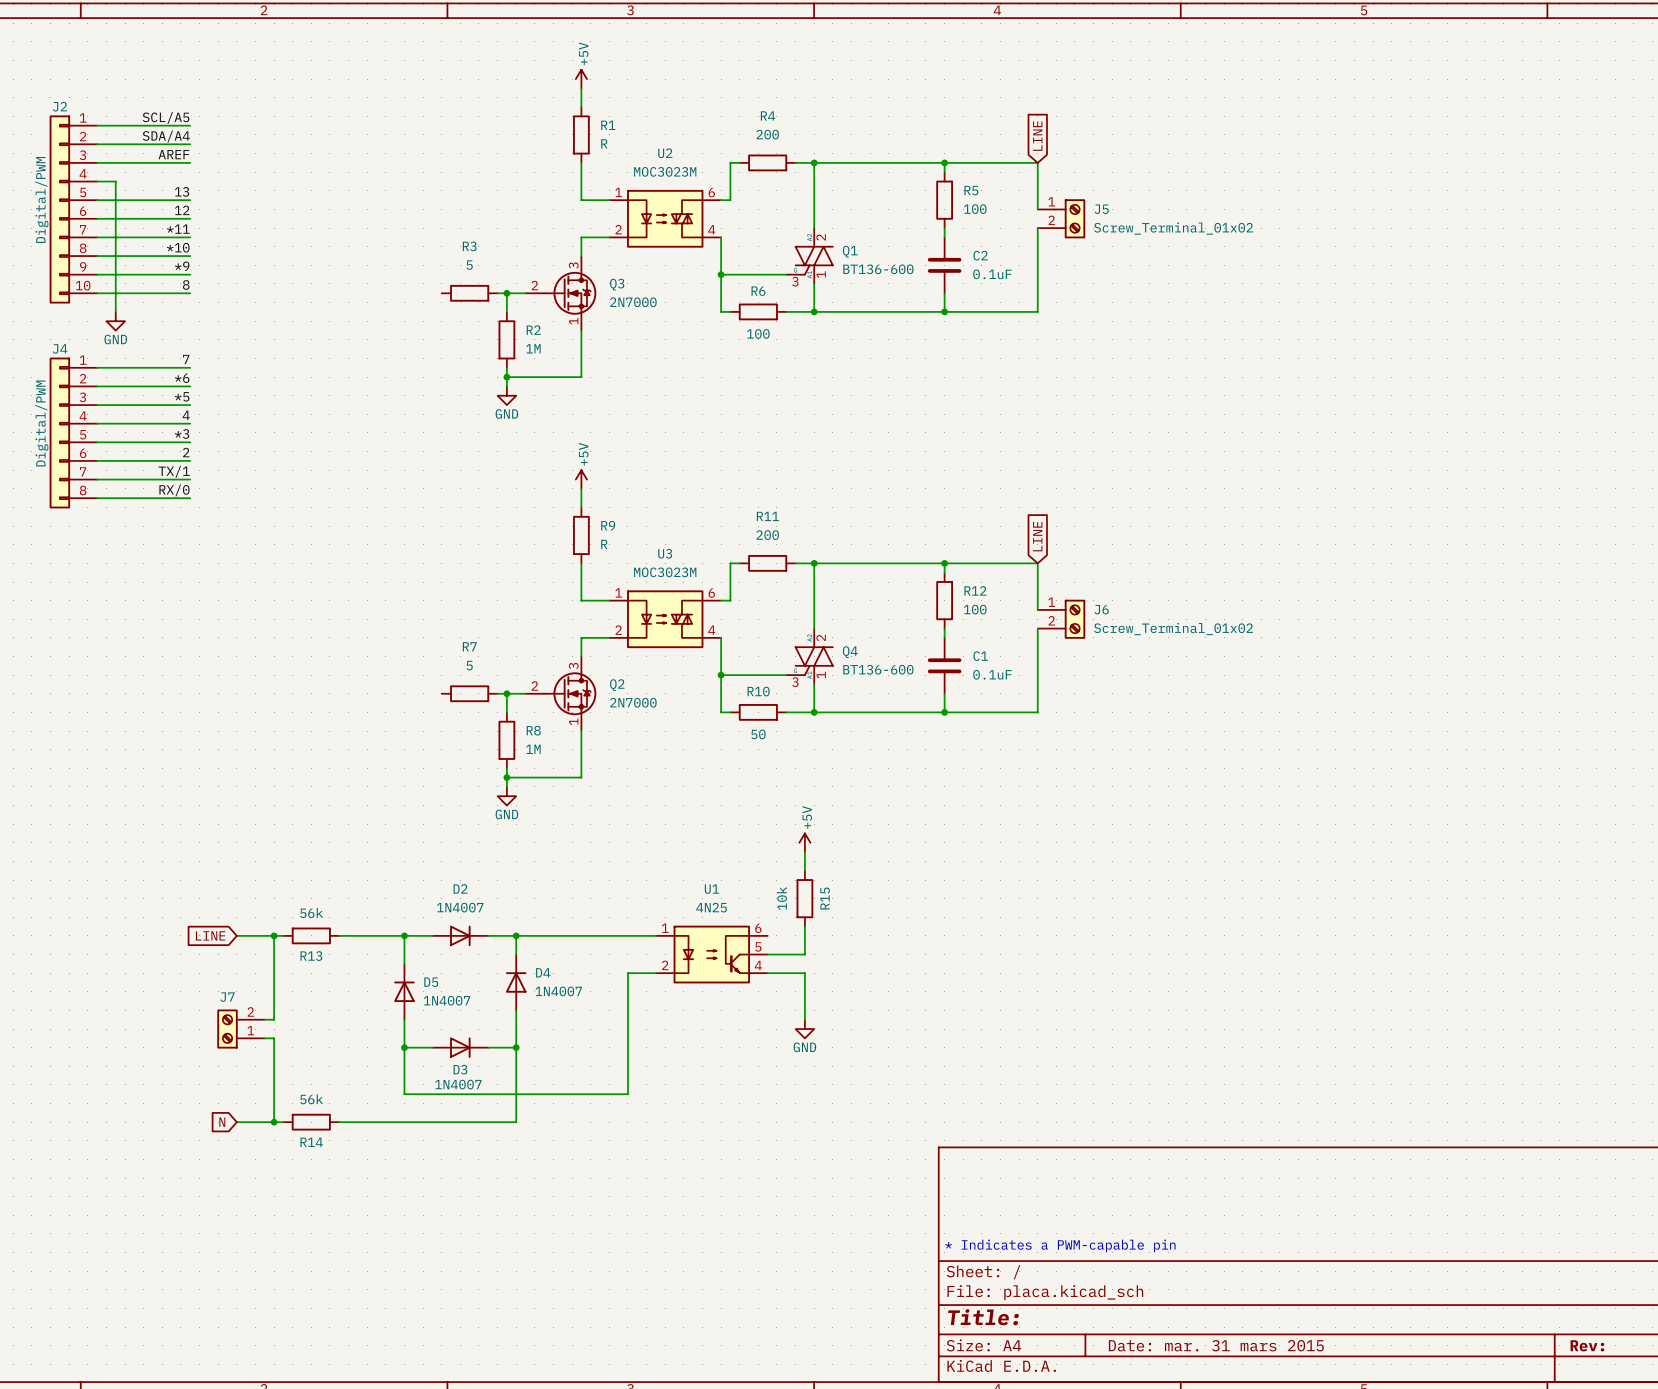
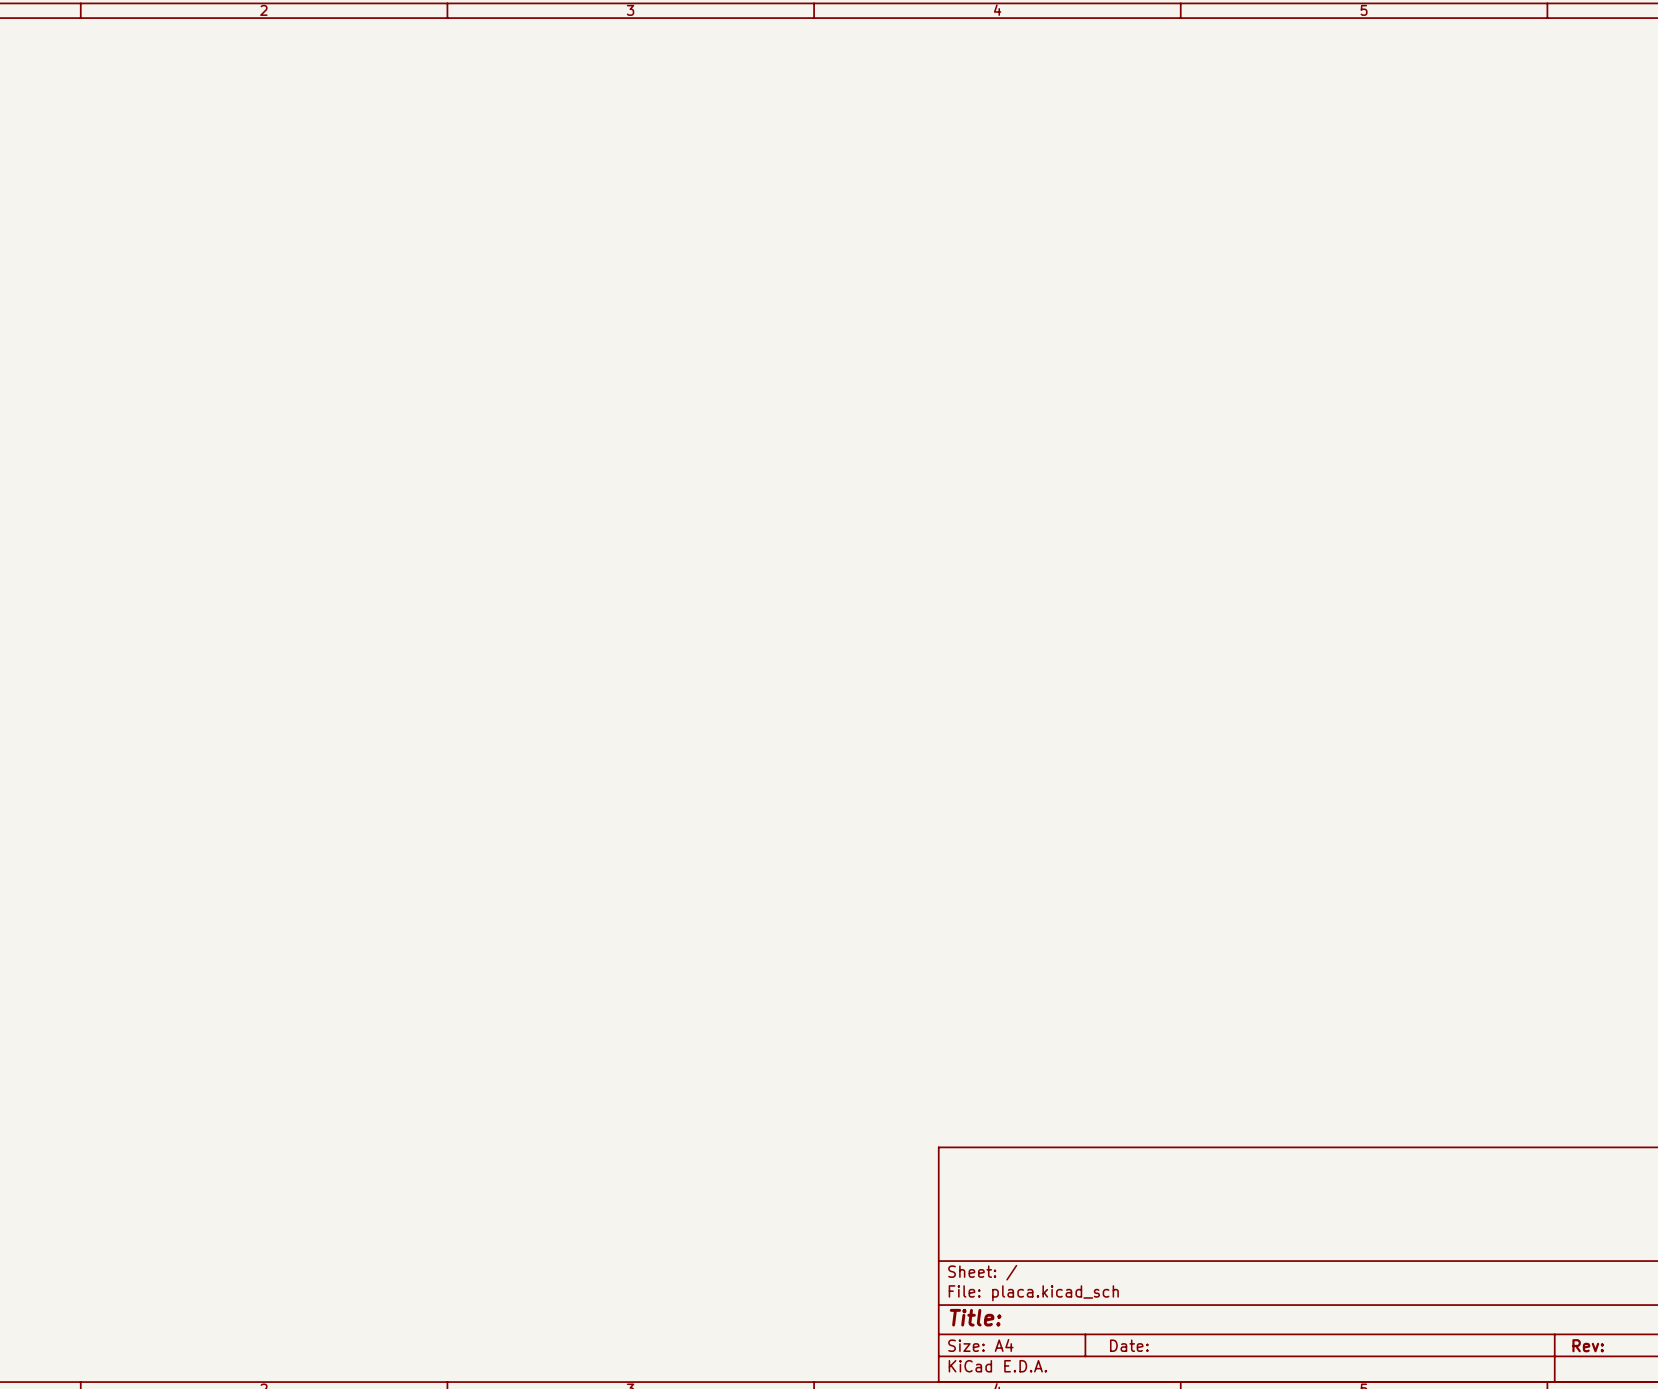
power symbol: +5V (581, 79) -> none
wire: (581, 88) (581, 107) -> none
label: SCL/A5 (166, 117) -> none
wire: (97, 125) (190, 125) -> none
R1: R (581, 134) -> none
label: SDA/A4 (166, 136) -> none
global label: LINE (1037, 136) -> none
wire: (97, 144) (190, 144) -> none
label: AREF (173, 154) -> none
wire: (97, 162) (190, 162) -> none
wire: (581, 162) (581, 200) (609, 200) -> none
wire: (739, 162) (730, 162) (730, 200) (721, 200) -> none
R4: 200 (767, 162) -> none
wire: (795, 162) (1037, 162) (1037, 209) -> none
wire: (814, 162) (814, 228) -> none
junction: (814, 162) -> none
wire: (944, 162) (944, 172) -> none
junction: (944, 162) -> none
wire: (97, 181) (115, 181) (115, 311) -> none
label: 13 (182, 191) -> none
wire: (97, 200) (190, 200) -> none
R5: 100 (944, 200) -> none
J2: Digital/PWM (73, 209) -> none
label: 12 (182, 210) -> none
wire: (97, 218) (190, 218) -> none
U2: MOC3023M (665, 218) -> none
J5: Screw_Terminal_01x02 (1061, 218) -> none
wire: (944, 228) (944, 237) -> none
wire: (1037, 228) (1037, 311) (786, 311) -> none
label: *11 (178, 229) -> none
wire: (97, 237) (190, 237) -> none
wire: (609, 237) (581, 237) (581, 256) -> none
wire: (721, 237) (721, 311) (730, 311) -> none
label: *10 (178, 247) -> none
wire: (97, 256) (190, 256) -> none
Q1: BT136-600 (809, 256) -> none
C2: 0.1uF (944, 265) -> none
label: *9 (182, 266) -> none
wire: (97, 274) (190, 274) -> none
wire: (721, 274) (786, 274) -> none
junction: (721, 274) -> none
wire: (814, 283) (814, 311) -> none
label: 8 (186, 284) -> none
wire: (97, 293) (190, 293) -> none
R3: 5 (469, 293) -> none
wire: (497, 293) (525, 293) -> none
wire: (506, 293) (506, 311) -> none
junction: (506, 293) -> none
Q3: 2N7000 (560, 293) -> none
wire: (944, 293) (944, 311) -> none
R6: 100 (758, 311) -> none
junction: (814, 311) -> none
junction: (944, 311) -> none
power symbol: GND (115, 321) -> none
wire: (581, 330) (581, 377) (506, 377) -> none
R2: 1M (506, 339) -> none
label: 7 (186, 359) -> none
wire: (97, 367) (190, 367) -> none
wire: (506, 367) (506, 386) -> none
junction: (506, 377) -> none
label: *6 (182, 378) -> none
wire: (97, 386) (190, 386) -> none
power symbol: GND (506, 395) -> none
label: *5 (182, 396) -> none
wire: (97, 405) (190, 405) -> none
label: 4 (186, 415) -> none
wire: (97, 423) (190, 423) -> none
J4: Digital/PWM (73, 432) -> none
label: *3 (181, 434) -> none
wire: (97, 442) (190, 442) -> none
label: 2 (186, 452) -> none
wire: (97, 460) (190, 460) -> none
label: TX/1 (174, 471) -> none
wire: (97, 479) (190, 479) -> none
power symbol: +5V (581, 479) -> none
wire: (581, 488) (581, 507) -> none
label: RX/0 (174, 490) -> none
wire: (97, 498) (190, 498) -> none
R9: R (581, 535) -> none
global label: LINE (1037, 536) -> none
wire: (581, 563) (581, 600) (609, 600) -> none
wire: (739, 563) (730, 563) (730, 600) (721, 600) -> none
R11: 200 (767, 563) -> none
wire: (795, 563) (1037, 563) (1037, 609) -> none
wire: (814, 563) (814, 628) -> none
junction: (814, 563) -> none
wire: (944, 563) (944, 572) -> none
junction: (944, 563) -> none
R12: 100 (944, 600) -> none
U3: MOC3023M (665, 619) -> none
J6: Screw_Terminal_01x02 (1061, 619) -> none
wire: (944, 628) (944, 637) -> none
wire: (1037, 628) (1037, 712) (786, 712) -> none
wire: (609, 637) (581, 637) (581, 656) -> none
wire: (721, 637) (721, 712) (730, 712) -> none
Q4: BT136-600 (809, 656) -> none
C1: 0.1uF (944, 665) -> none
wire: (721, 675) (786, 675) -> none
junction: (721, 675) -> none
wire: (814, 684) (814, 712) -> none
R7: 5 (469, 693) -> none
wire: (497, 693) (525, 693) -> none
wire: (506, 693) (506, 712) -> none
junction: (506, 693) -> none
Q2: 2N7000 (560, 693) -> none
wire: (944, 693) (944, 712) -> none
R10: 50 (758, 712) -> none
junction: (814, 712) -> none
junction: (944, 712) -> none
wire: (581, 731) (581, 777) (506, 777) -> none
R8: 1M (506, 740) -> none
wire: (506, 768) (506, 786) -> none
junction: (506, 777) -> none
power symbol: GND (506, 796) -> none
power symbol: +5V (804, 842) -> none
wire: (804, 852) (804, 870) -> none
R15: 10k (804, 898) -> none
wire: (804, 926) (804, 954) (767, 954) -> none
global label: LINE (210, 935) -> none
wire: (236, 935) (283, 935) -> none
wire: (274, 935) (274, 1019) (264, 1019) -> none
junction: (274, 935) -> none
R13: 56k (311, 935) -> none
wire: (339, 935) (432, 935) -> none
wire: (404, 935) (404, 963) -> none
junction: (404, 935) -> none
D2: 1N4007 (460, 935) -> none
wire: (488, 935) (655, 935) -> none
wire: (516, 935) (516, 954) -> none
junction: (516, 935) -> none
U1: 4N25 (711, 954) -> none
wire: (655, 973) (627, 973) (627, 1094) (404, 1094) (404, 1019) -> none
wire: (767, 973) (804, 973) (804, 1019) -> none
D4: 1N4007 (516, 982) -> none
D5: 1N4007 (404, 991) -> none
wire: (516, 1010) (516, 1122) (339, 1122) -> none
J7: (241, 1029) -> none
power symbol: GND (804, 1029) -> none
wire: (264, 1038) (274, 1038) (274, 1122) -> none
wire: (404, 1047) (432, 1047) -> none
junction: (404, 1047) -> none
D3: 1N4007 (460, 1047) -> none
wire: (488, 1047) (516, 1047) -> none
junction: (516, 1047) -> none
global label: N (222, 1122) -> none
wire: (236, 1122) (283, 1122) -> none
junction: (274, 1122) -> none
R14: 56k (311, 1122) -> none
text: * Indicates a PWM-capable pin (1060, 1245) -> none
title block: Date: mar. 31 mars 2015 (1216, 1345) -> Date: (1129, 1345)

